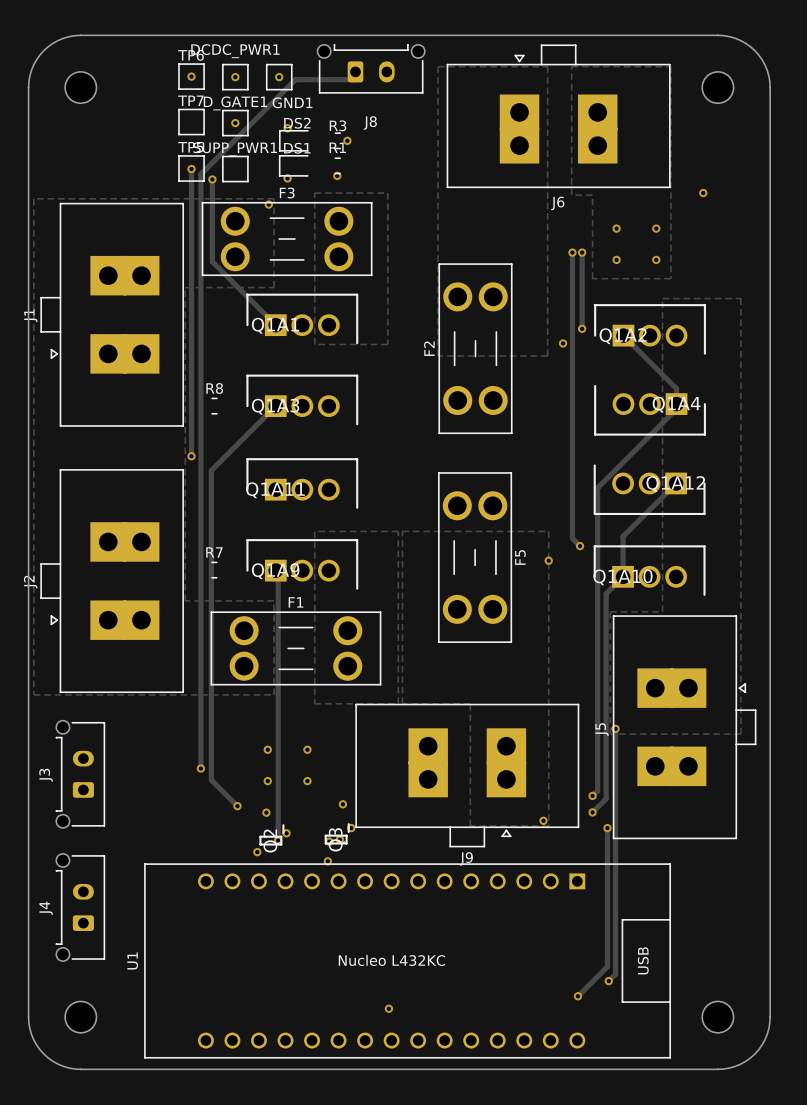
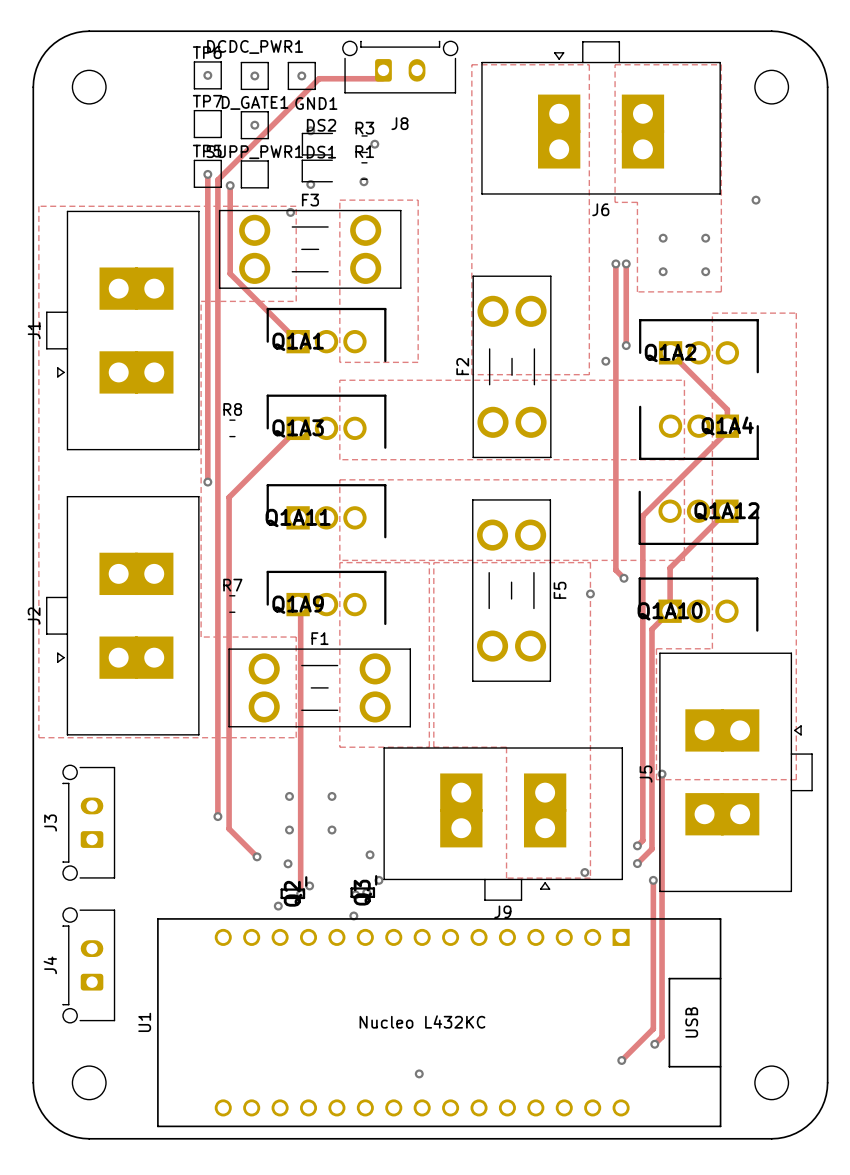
zone outline: none -> (339, 380) (339, 459) (684, 459) (684, 380) (339, 380)
zone outline: none -> (339, 479) (339, 560) (684, 560) (684, 479) (339, 479)

